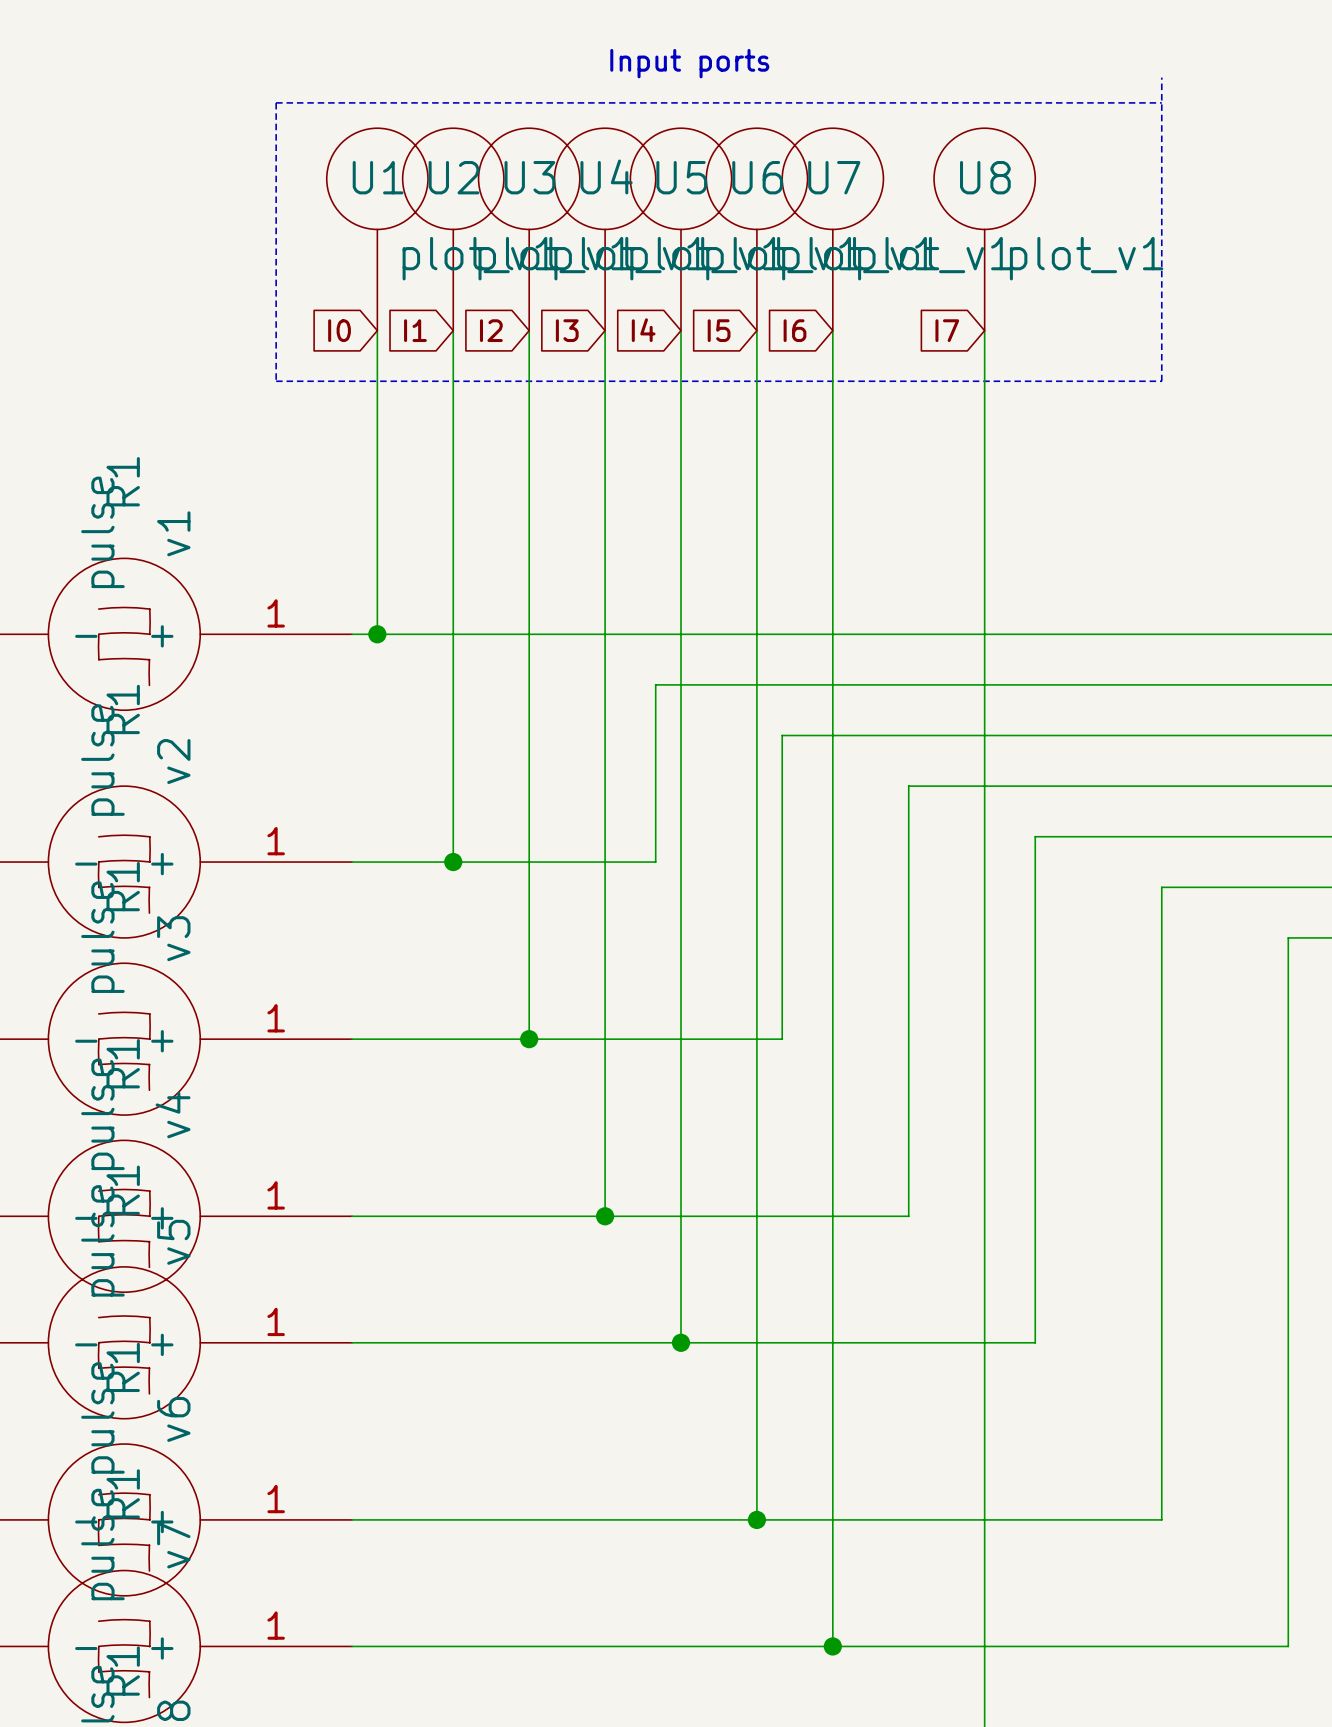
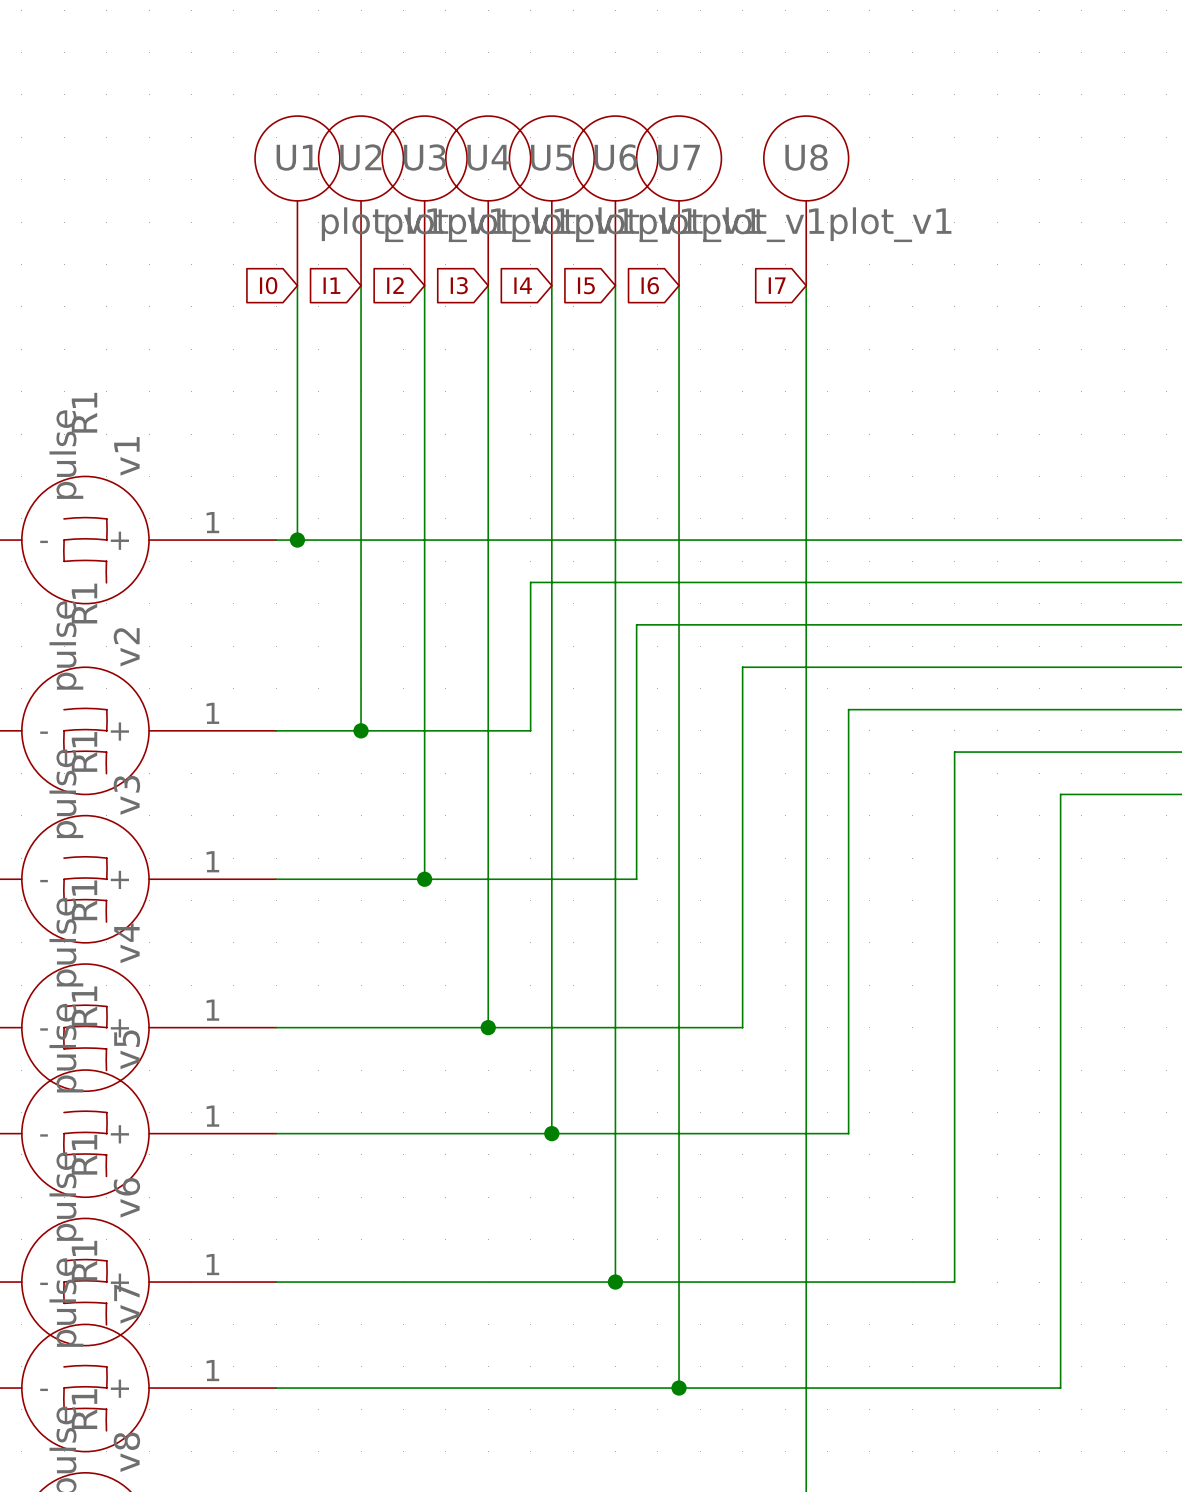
text: Input ports (689, 63) -> none
line: (1161, 77) (1161, 381) (276, 381) (276, 102) (1161, 102) -> none

